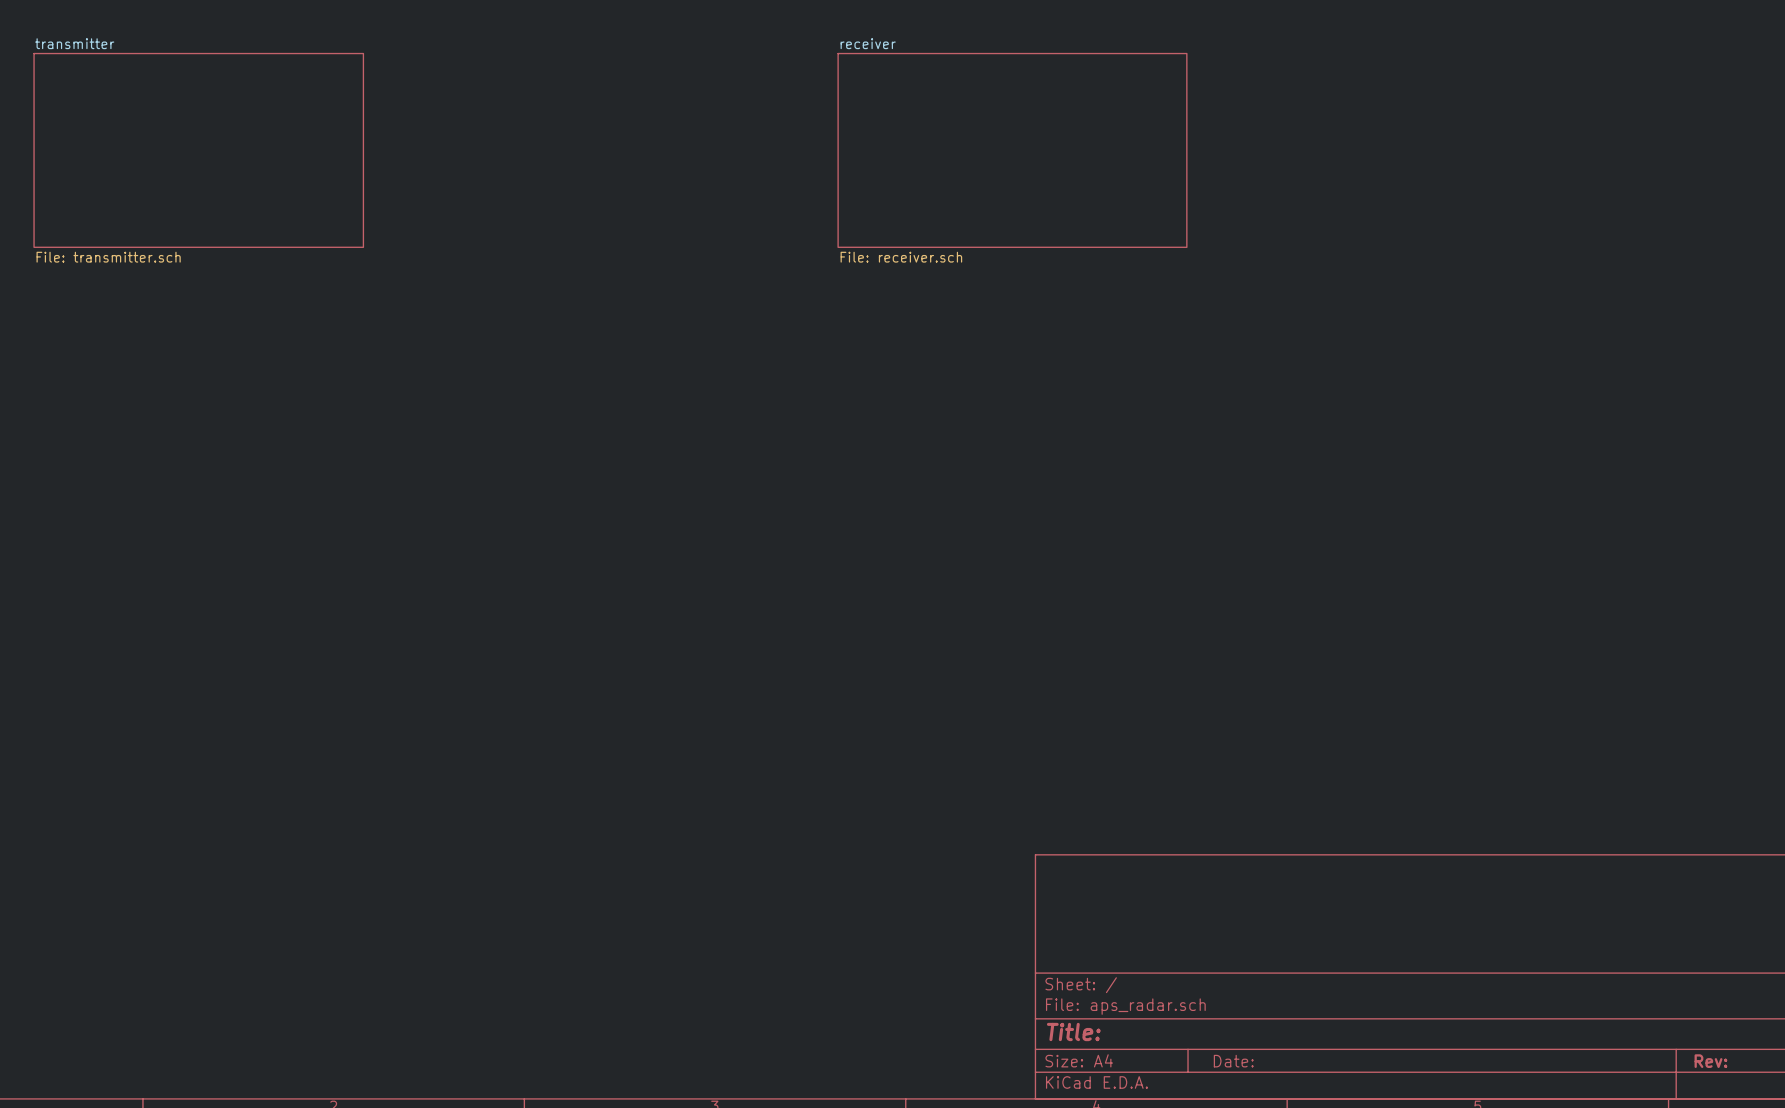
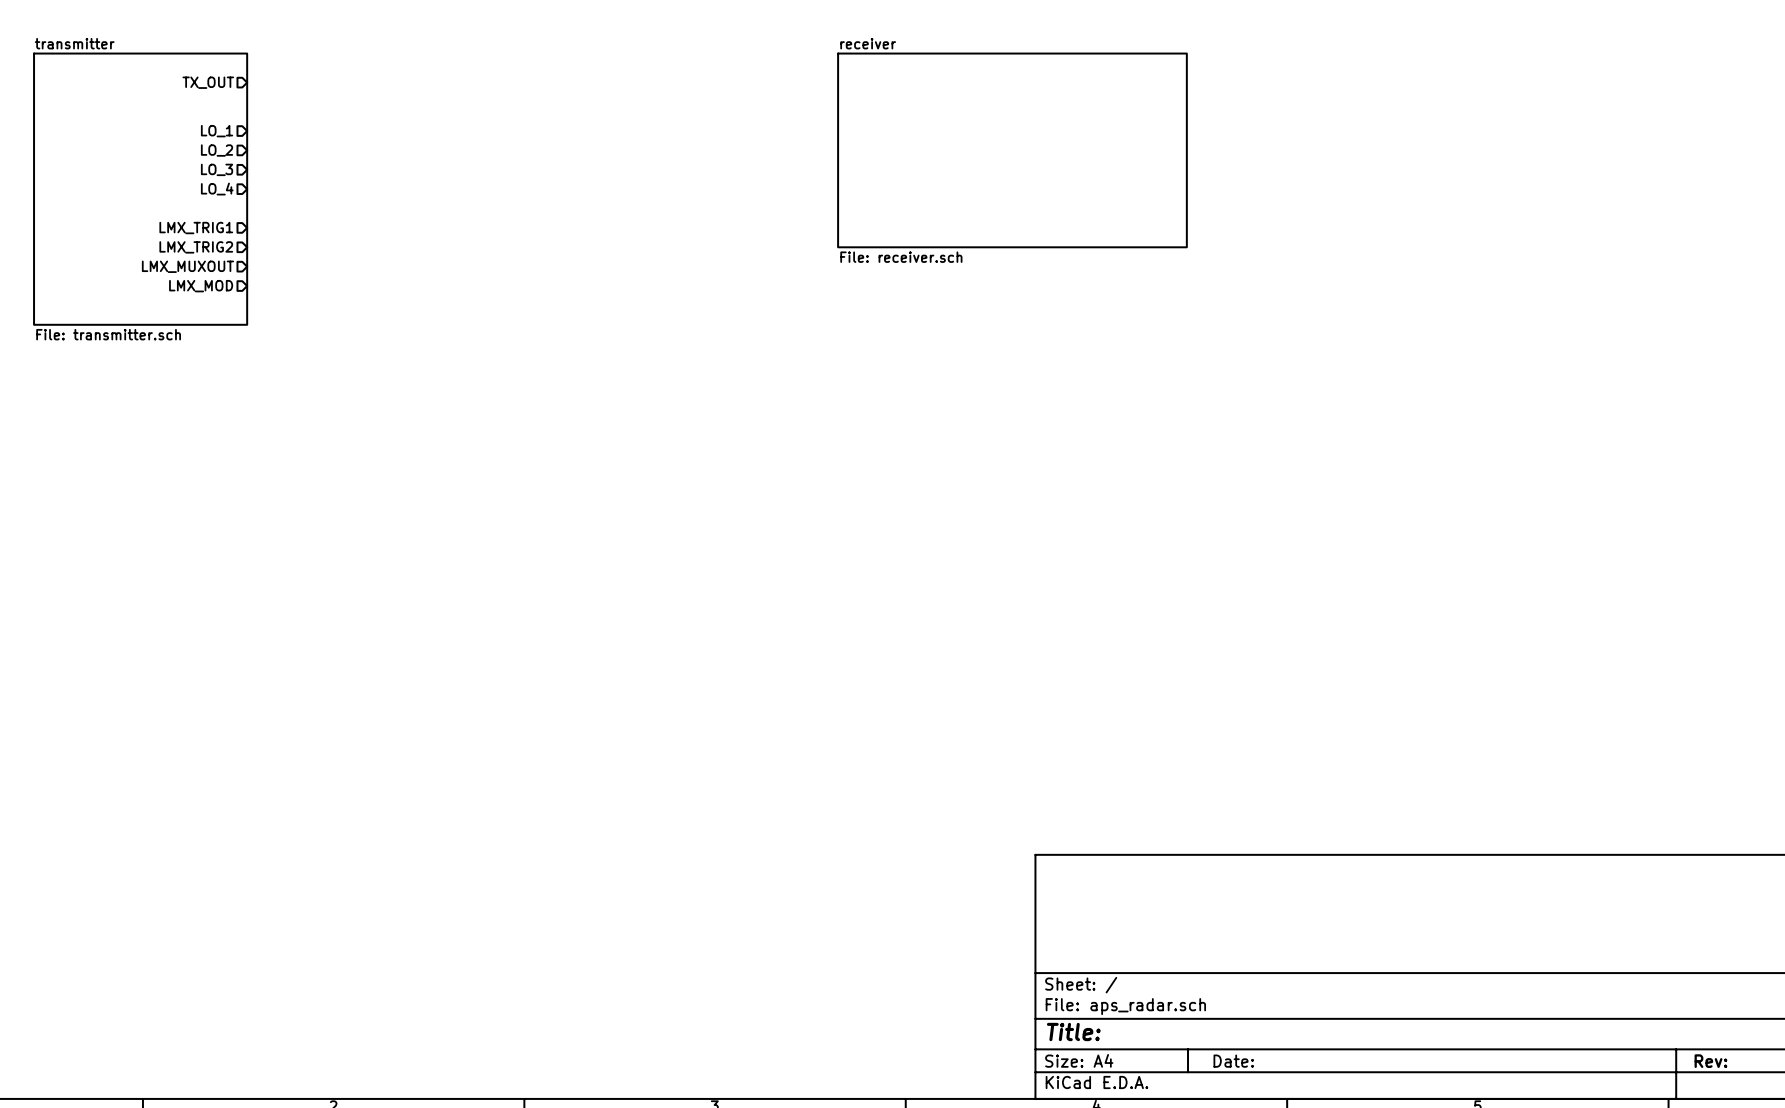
sheet pin: none -> TX_OUT (208, 82)
sheet pin: none -> LO_1 (217, 131)
sheet transmitter: File: transmitter.sch (198, 150) -> none
sheet pin: none -> LO_2 (217, 150)
sheet pin: none -> LO_3 (217, 169)
sheet transmitter: none -> File: transmitter.sch (140, 189)
sheet pin: none -> LO_4 (217, 189)
sheet pin: none -> LMX_TRIG1 (196, 228)
sheet pin: none -> LMX_TRIG2 (196, 247)
sheet pin: none -> LMX_MUXOUT (187, 266)
sheet pin: none -> LMX_MOD (201, 286)

